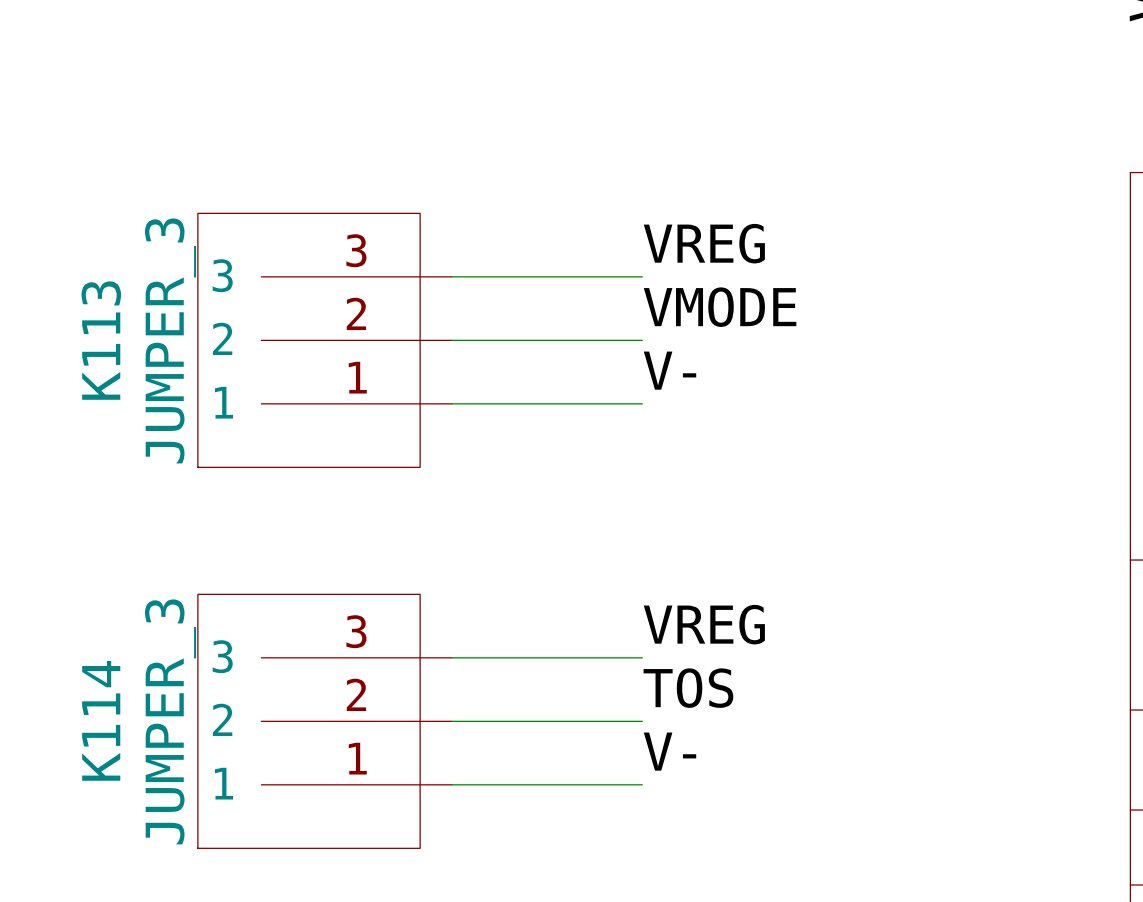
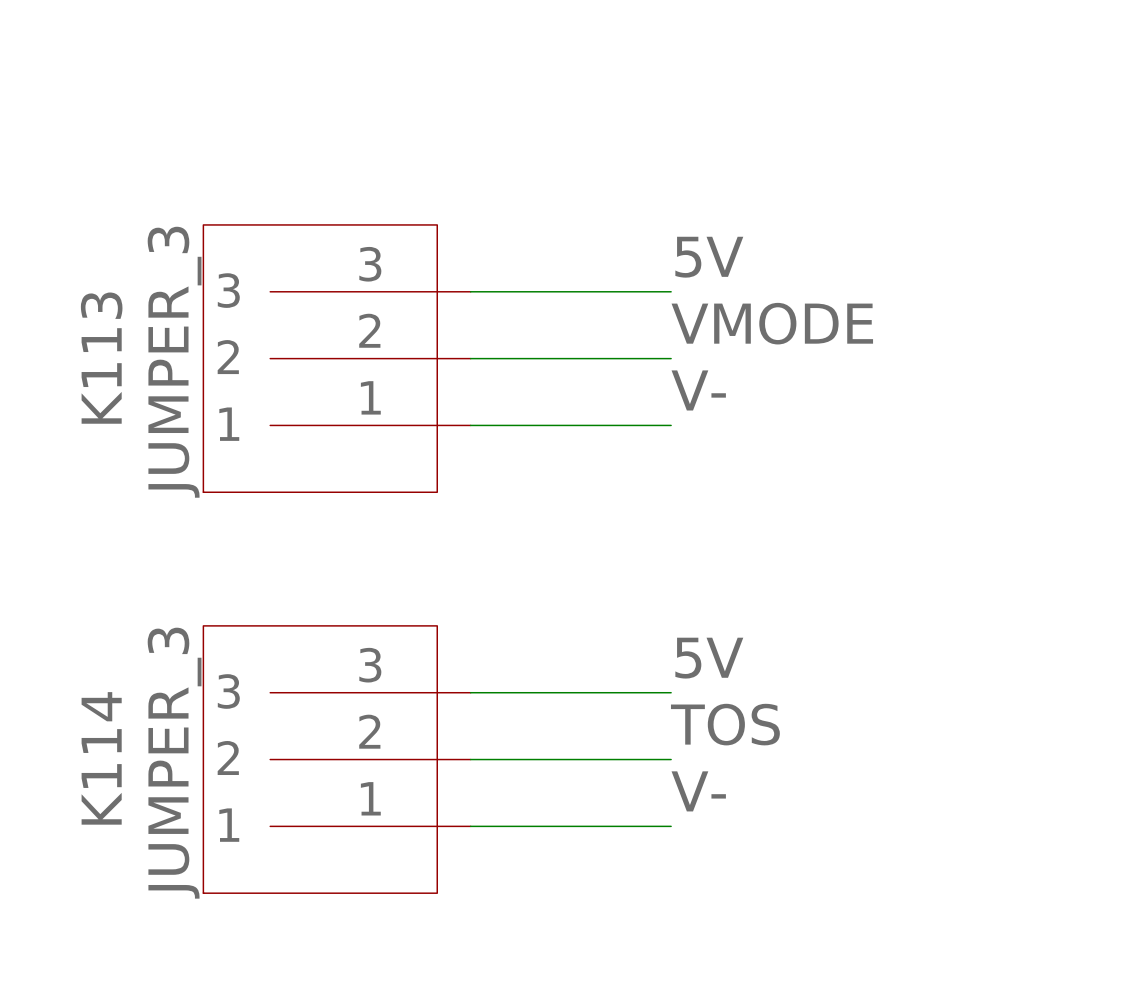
label: VREG (704, 243) -> 5V (709, 257)
label: VREG (704, 624) -> 5V (709, 658)

